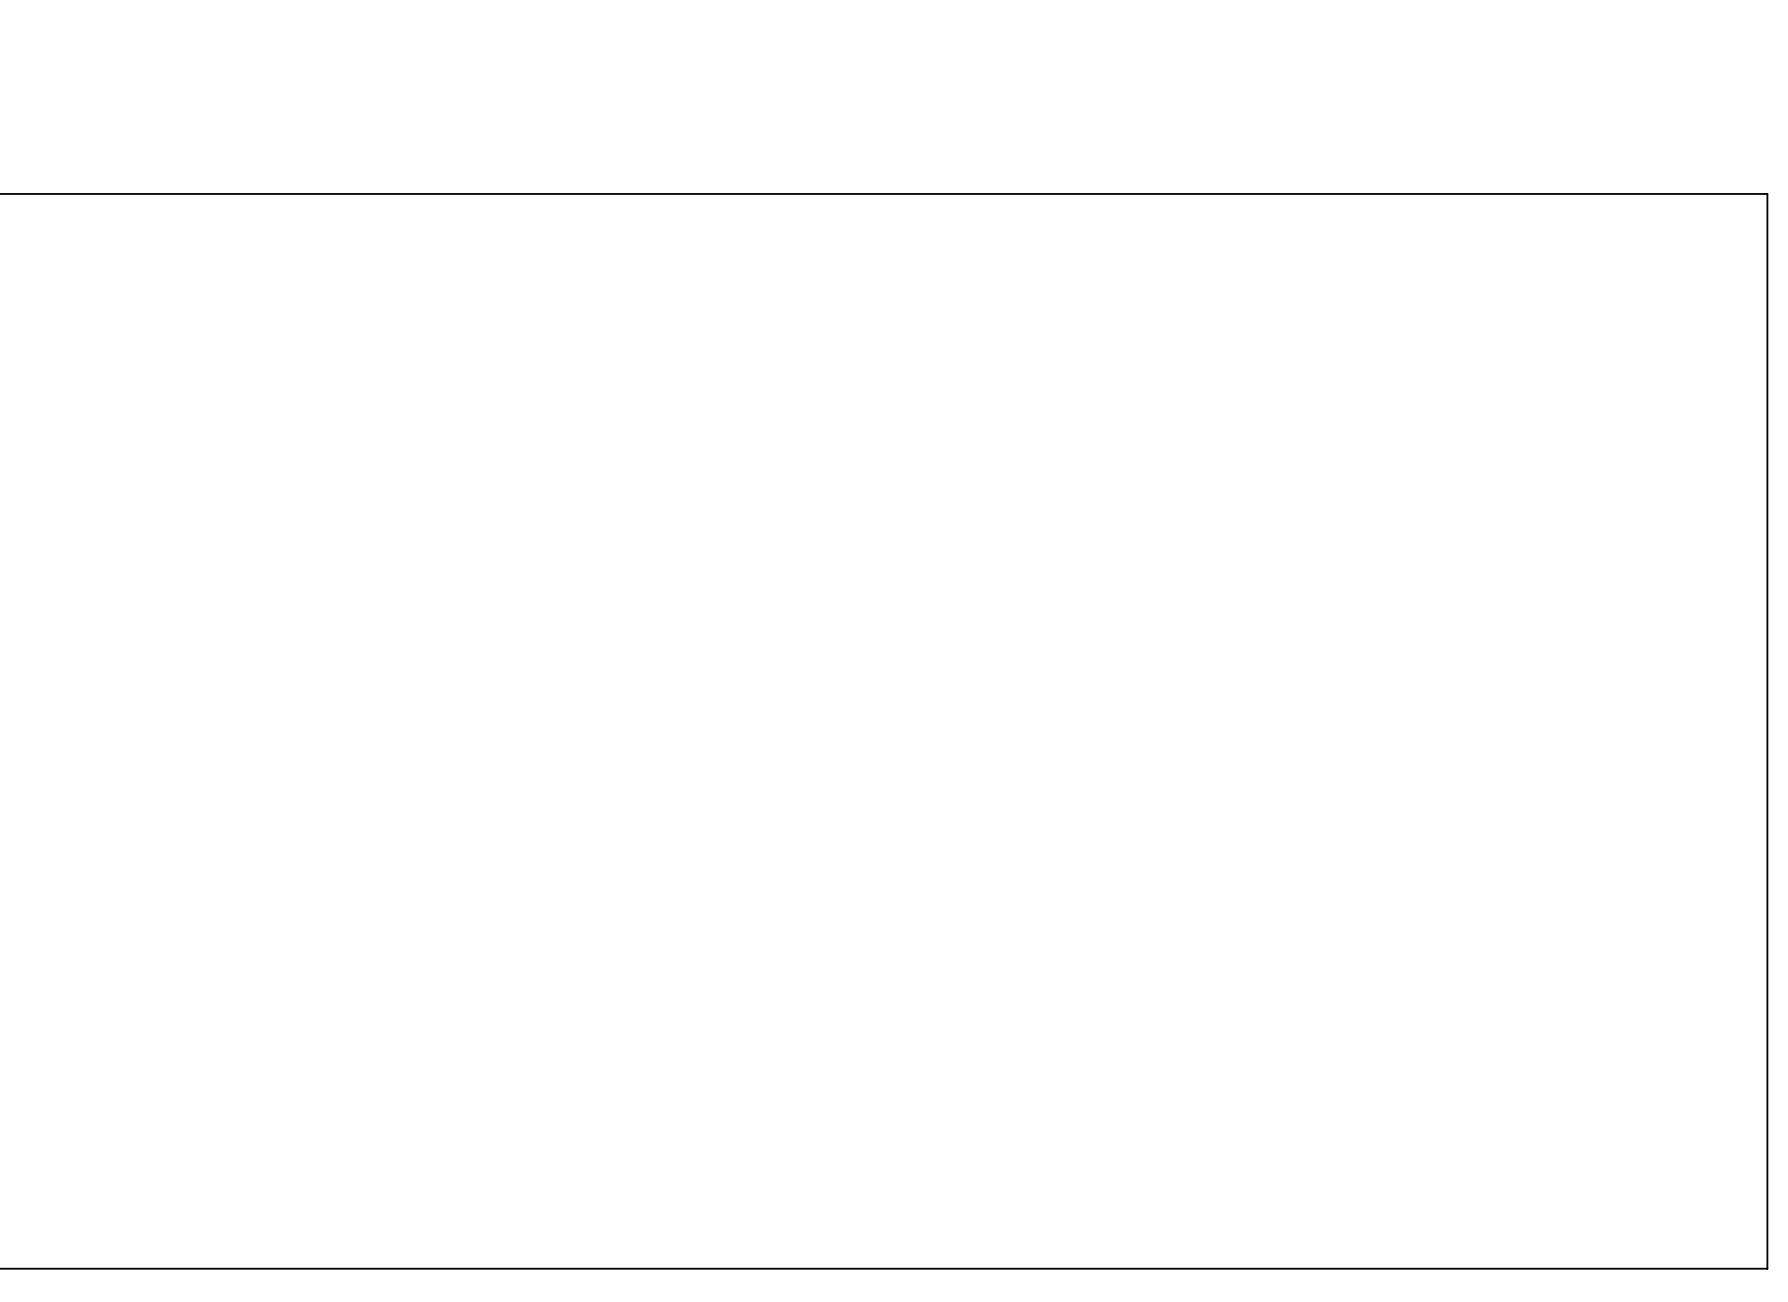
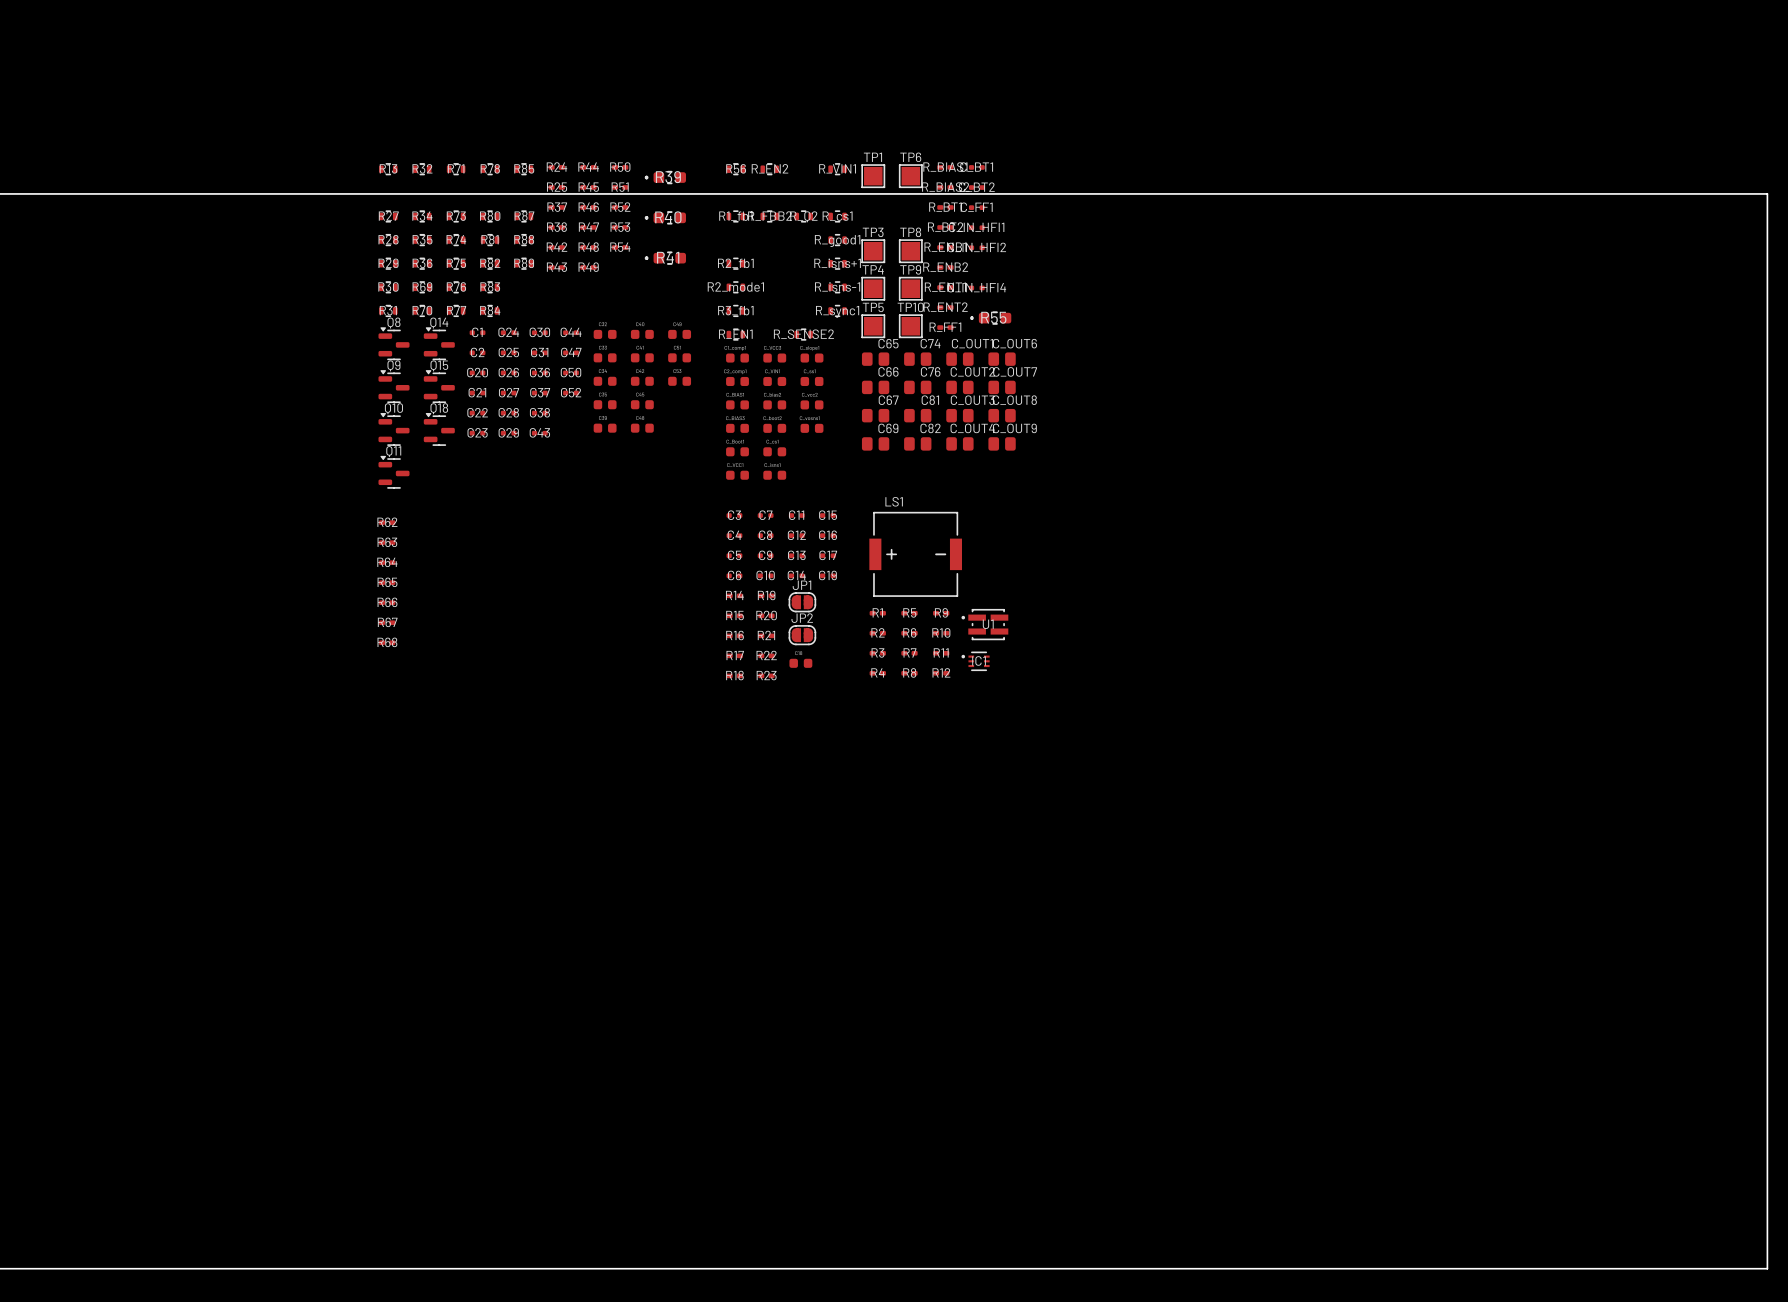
R24: none -> (556, 167)
R44: none -> (588, 167)
R50: none -> (620, 167)
R_BIAS1: none -> (945, 167)
C_BT1: none -> (976, 167)
R13: none -> (388, 169)
R32: none -> (422, 169)
R71: none -> (456, 169)
R78: none -> (490, 169)
R85: none -> (523, 169)
R56: none -> (735, 169)
R_EN2: none -> (769, 169)
R_VIN1: none -> (837, 169)
TP1: none -> (873, 176)
TP6: none -> (910, 176)
R39: none -> (665, 177)
R25: none -> (556, 187)
R45: none -> (588, 187)
R51: none -> (620, 187)
R_BIAS2: none -> (945, 187)
C_BT2: none -> (976, 187)
R37: none -> (556, 207)
R46: none -> (588, 207)
R52: none -> (620, 207)
R_BT1: none -> (945, 207)
C_FF1: none -> (976, 207)
R27: none -> (388, 216)
R34: none -> (422, 216)
R73: none -> (456, 216)
R80: none -> (490, 216)
R87: none -> (523, 216)
R1_fb1: none -> (735, 216)
R_FBB2: none -> (769, 216)
R_Q2: none -> (803, 216)
R_cs1: none -> (837, 216)
R40: none -> (665, 217)
R38: none -> (556, 227)
R47: none -> (588, 227)
R53: none -> (620, 227)
R_BT2: none -> (945, 227)
C_IN_HFI1: none -> (976, 227)
R28: none -> (388, 240)
R35: none -> (422, 240)
R74: none -> (456, 240)
R81: none -> (490, 240)
R88: none -> (523, 240)
R_good1: none -> (837, 240)
R42: none -> (556, 247)
R48: none -> (588, 247)
R54: none -> (620, 247)
R_ENB1: none -> (945, 247)
C_IN_HFI2: none -> (976, 247)
TP3: none -> (873, 251)
TP8: none -> (910, 251)
R41: none -> (665, 258)
R29: none -> (388, 263)
R36: none -> (422, 263)
R75: none -> (456, 263)
R82: none -> (490, 263)
R89: none -> (523, 263)
R2_fb1: none -> (735, 263)
R_isns+1: none -> (837, 263)
R43: none -> (556, 267)
R49: none -> (588, 267)
R_ENB2: none -> (945, 267)
R30: none -> (388, 287)
R69: none -> (422, 287)
R76: none -> (456, 287)
R83: none -> (490, 287)
R2_mode1: none -> (735, 287)
R_isns-1: none -> (837, 287)
R_ENT1: none -> (945, 287)
C_IN_HFI4: none -> (976, 287)
TP4: none -> (873, 288)
TP9: none -> (910, 288)
R_ENT2: none -> (945, 307)
R31: none -> (388, 310)
R70: none -> (422, 310)
R77: none -> (456, 310)
R84: none -> (490, 310)
R3_fb1: none -> (735, 310)
R_sync1: none -> (837, 310)
R55: none -> (990, 318)
TP5: none -> (873, 326)
TP10: none -> (910, 326)
R_FF1: none -> (945, 327)
C1: none -> (477, 332)
C24: none -> (508, 332)
C30: none -> (539, 332)
C44: none -> (570, 332)
part: none -> (605, 334)
part: none -> (642, 334)
part: none -> (679, 334)
R_EN1: none -> (735, 334)
R_SENSE2: none -> (803, 334)
Q8: none -> (394, 343)
Q14: none -> (439, 343)
C2: none -> (477, 352)
C25: none -> (508, 352)
C31: none -> (539, 352)
C47: none -> (570, 352)
part: none -> (605, 357)
part: none -> (642, 357)
part: none -> (679, 357)
part: none -> (737, 358)
part: none -> (774, 358)
part: none -> (812, 358)
C65: none -> (875, 359)
C74: none -> (917, 359)
C_OUT1: none -> (959, 359)
C_OUT6: none -> (1002, 359)
C20: none -> (477, 372)
C26: none -> (508, 372)
C36: none -> (539, 372)
C50: none -> (570, 372)
part: none -> (605, 381)
part: none -> (642, 381)
part: none -> (679, 381)
part: none -> (737, 381)
part: none -> (774, 381)
part: none -> (812, 381)
Q9: none -> (394, 386)
Q15: none -> (439, 386)
C66: none -> (875, 387)
C76: none -> (917, 387)
C_OUT2: none -> (959, 387)
C_OUT7: none -> (1002, 387)
C21: none -> (477, 393)
C27: none -> (508, 393)
C37: none -> (539, 393)
C52: none -> (570, 393)
part: none -> (605, 404)
part: none -> (642, 404)
part: none -> (737, 404)
part: none -> (774, 404)
part: none -> (812, 404)
C22: none -> (477, 413)
C28: none -> (508, 413)
C38: none -> (539, 413)
C67: none -> (875, 415)
C81: none -> (917, 415)
C_OUT3: none -> (959, 415)
C_OUT8: none -> (1002, 415)
part: none -> (605, 428)
part: none -> (642, 428)
part: none -> (737, 428)
part: none -> (774, 428)
part: none -> (812, 428)
Q10: none -> (394, 429)
Q18: none -> (439, 429)
C23: none -> (477, 433)
C29: none -> (508, 433)
C43: none -> (539, 433)
C69: none -> (875, 443)
C82: none -> (917, 443)
C_OUT4: none -> (959, 443)
C_OUT9: none -> (1002, 443)
part: none -> (737, 451)
part: none -> (774, 451)
Q11: none -> (394, 472)
part: none -> (737, 475)
part: none -> (774, 475)
C3: none -> (734, 515)
C7: none -> (765, 515)
C11: none -> (796, 515)
C15: none -> (827, 515)
R62: none -> (387, 522)
C4: none -> (734, 535)
C8: none -> (765, 535)
C12: none -> (796, 535)
C16: none -> (827, 535)
R63: none -> (387, 542)
LS1: none -> (915, 554)
C5: none -> (734, 555)
C9: none -> (765, 555)
C13: none -> (796, 555)
C17: none -> (827, 555)
R64: none -> (387, 562)
C6: none -> (734, 575)
C10: none -> (765, 575)
C14: none -> (796, 575)
C19: none -> (827, 575)
R65: none -> (387, 582)
R14: none -> (734, 595)
R19: none -> (766, 595)
R66: none -> (387, 602)
JP1: none -> (802, 602)
R1: none -> (877, 613)
R5: none -> (909, 613)
R9: none -> (941, 613)
R15: none -> (734, 615)
R20: none -> (766, 615)
R67: none -> (387, 622)
U1: none -> (984, 624)
R2: none -> (877, 633)
R6: none -> (909, 633)
R10: none -> (941, 633)
R16: none -> (734, 635)
R21: none -> (766, 635)
JP2: none -> (802, 635)
R68: none -> (387, 642)
R3: none -> (877, 653)
R7: none -> (909, 653)
R11: none -> (941, 653)
R17: none -> (734, 655)
R22: none -> (766, 655)
IC1: none -> (975, 661)
part: none -> (800, 663)
R4: none -> (877, 673)
R8: none -> (909, 673)
R12: none -> (941, 673)
R18: none -> (734, 675)
R23: none -> (766, 675)

